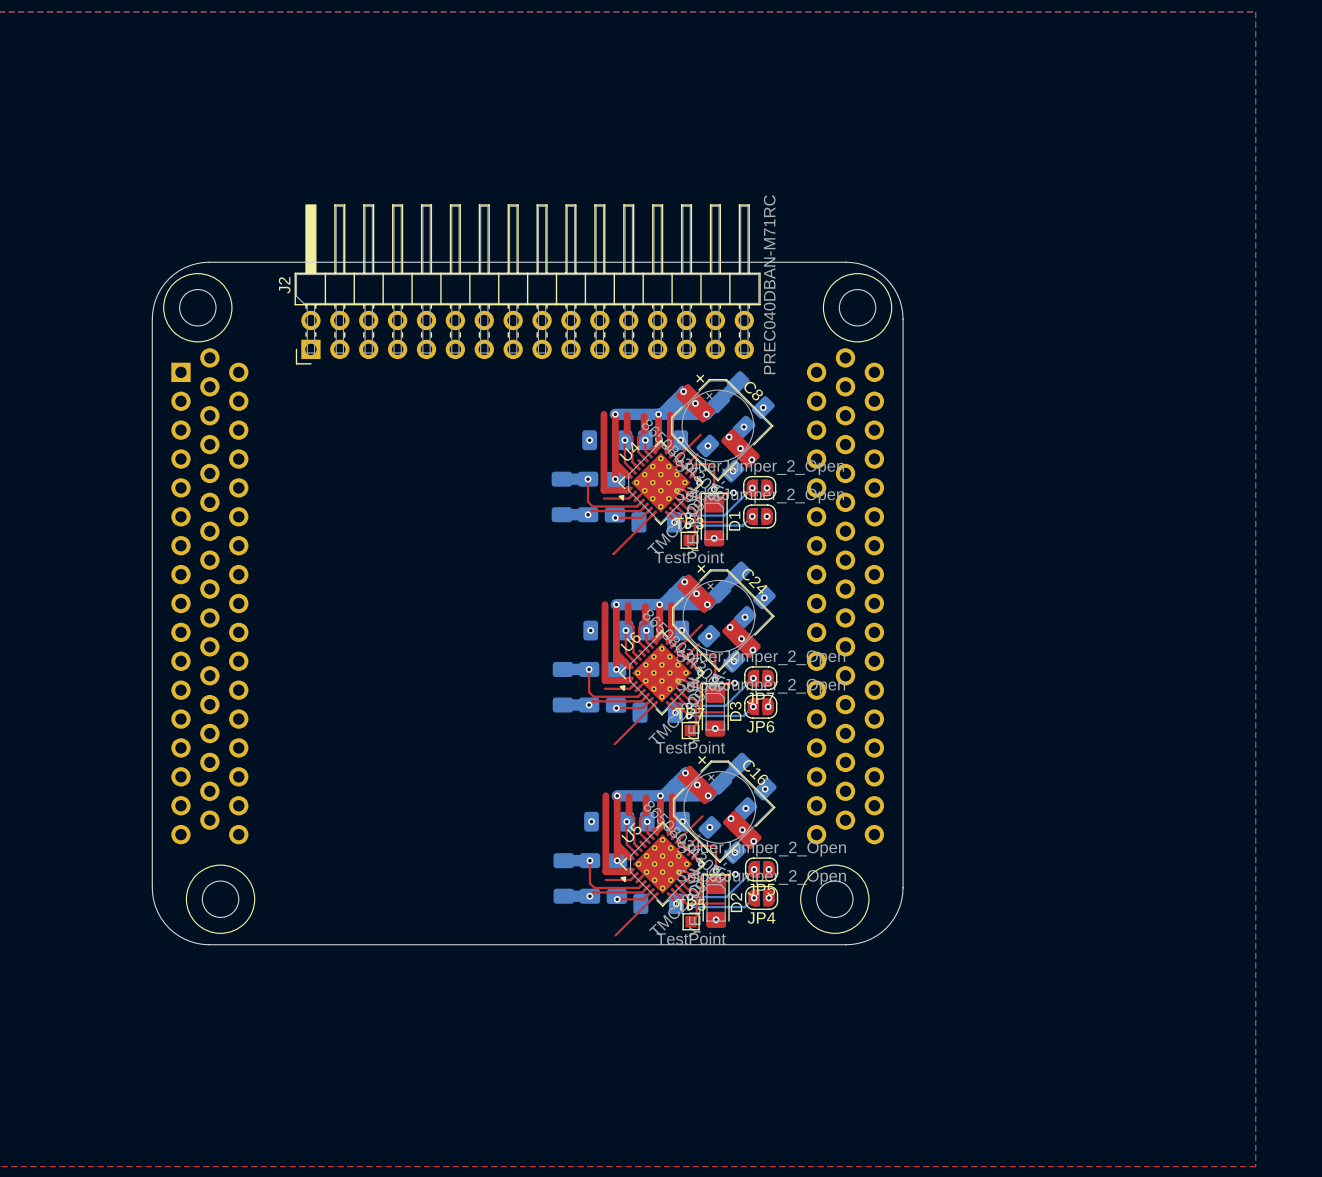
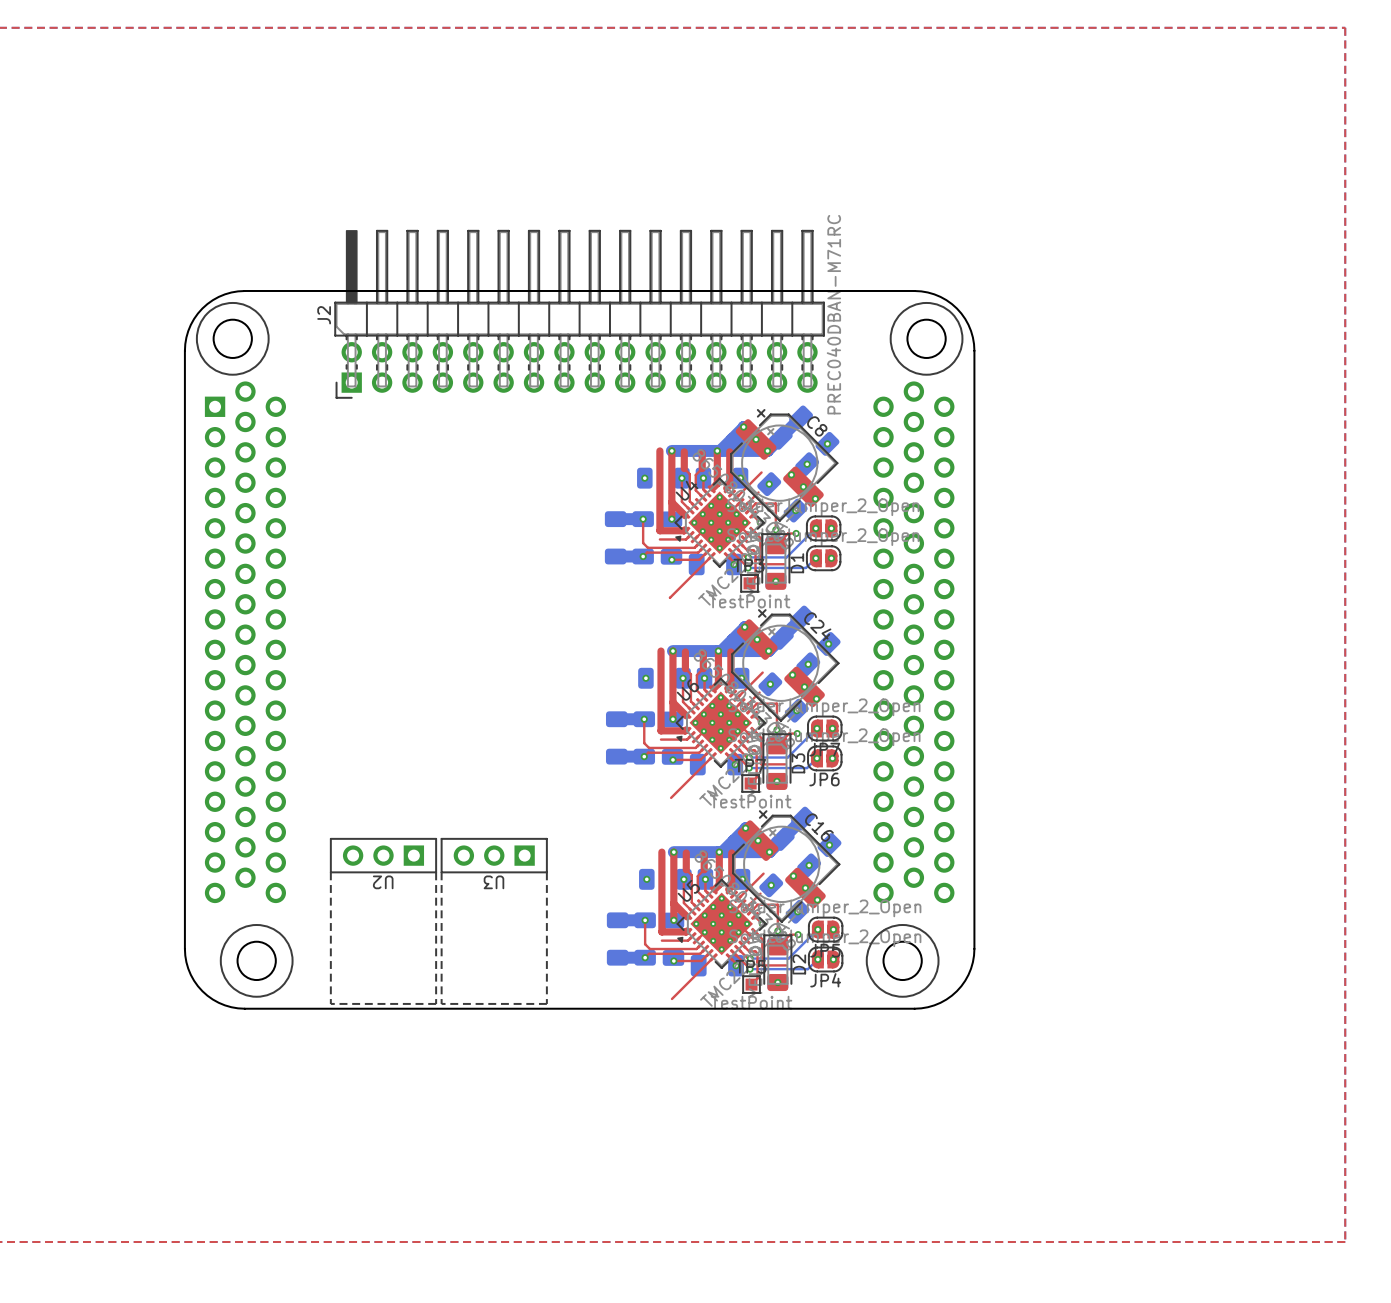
U2: none -> (383, 921)
U3: none -> (494, 921)

